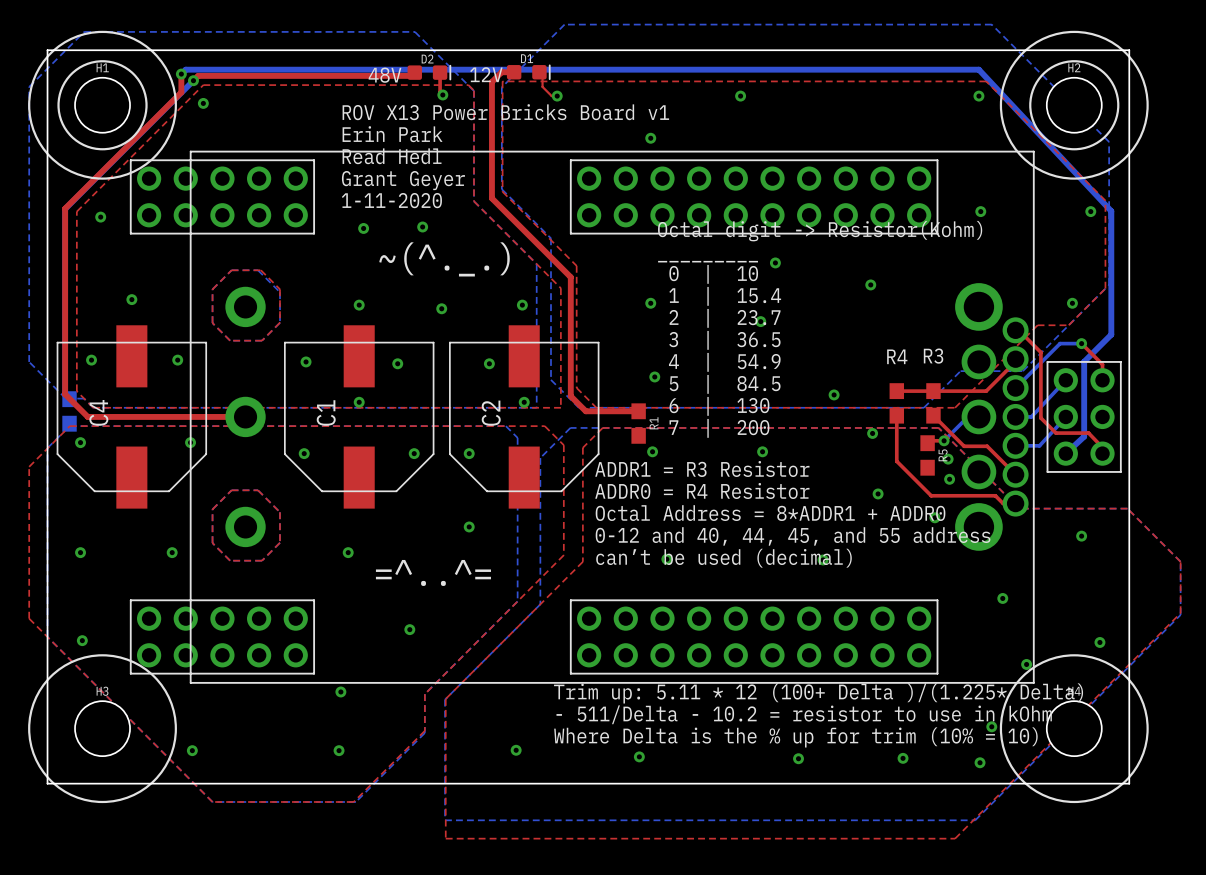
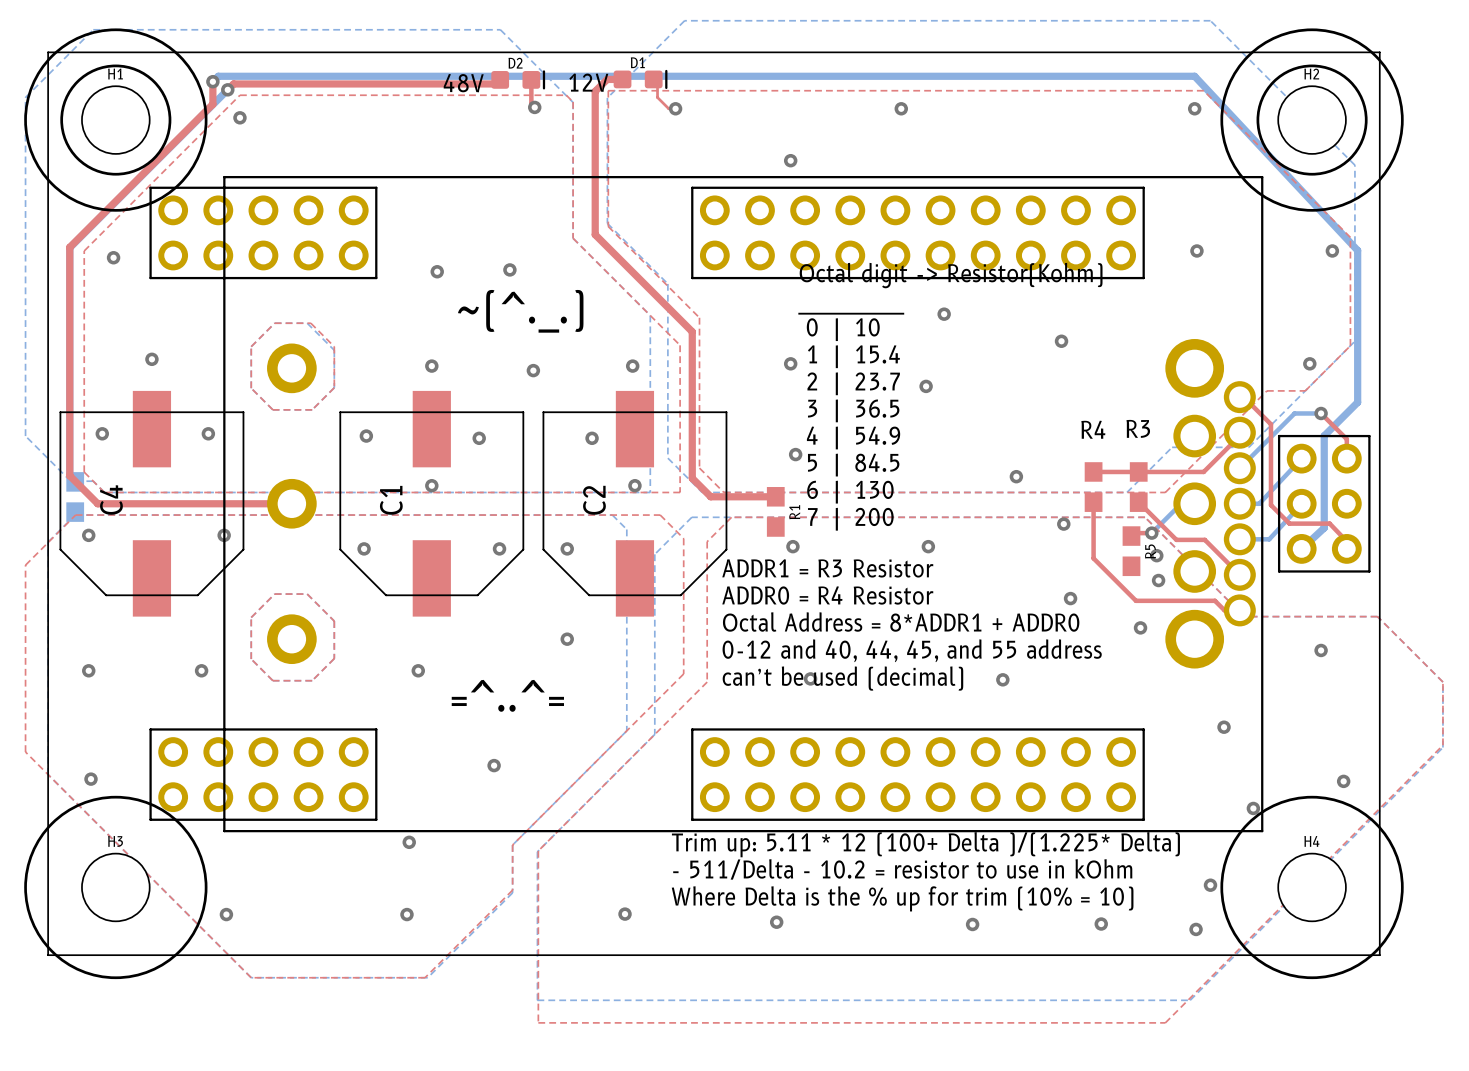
text: ROV X13 Power Bricks Board v1 (505, 112) -> none
text: Erin Park (392, 134) -> none
text: Read Hedl (392, 156) -> none
text: Grant Geyer (403, 180) -> none
text: 1-11-2020 (391, 200) -> none

